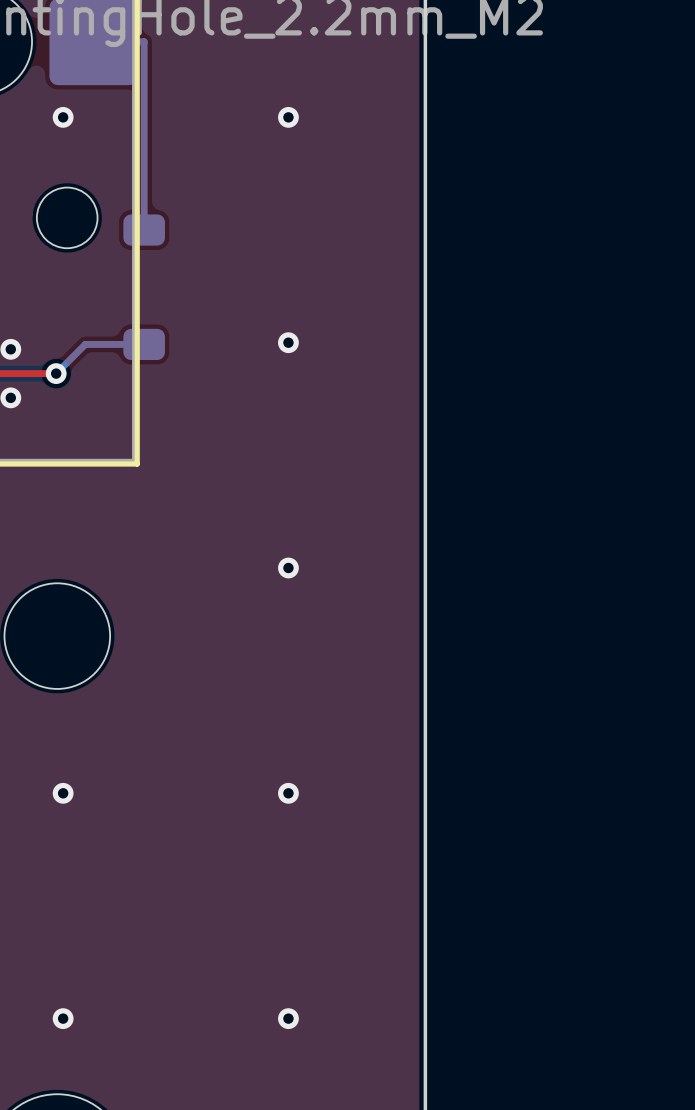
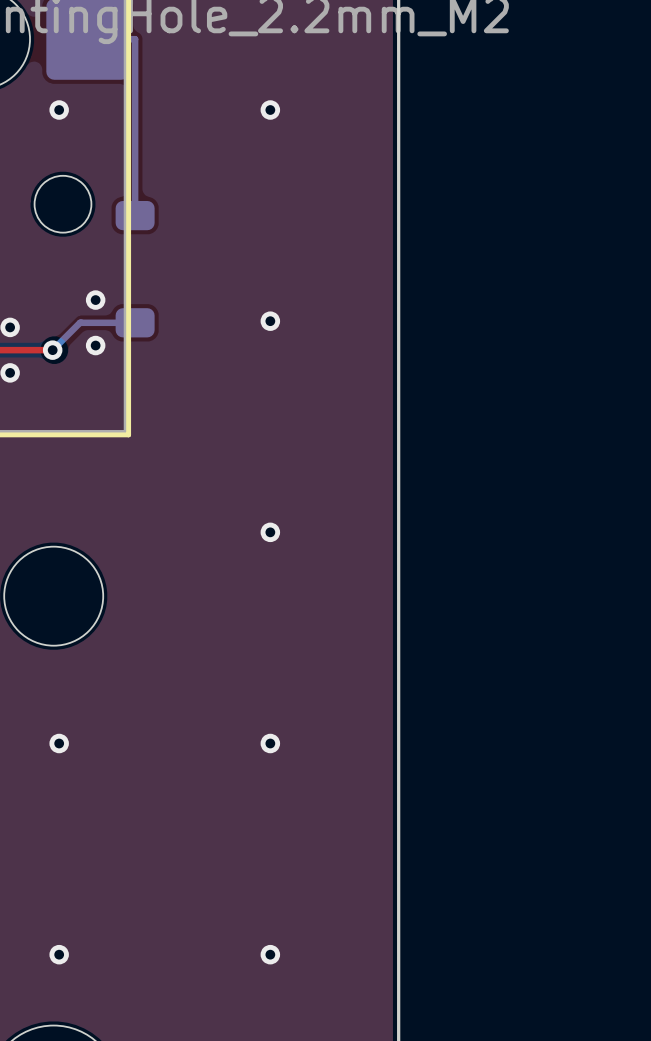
via: none -> (95, 300)
via: none -> (95, 345)

